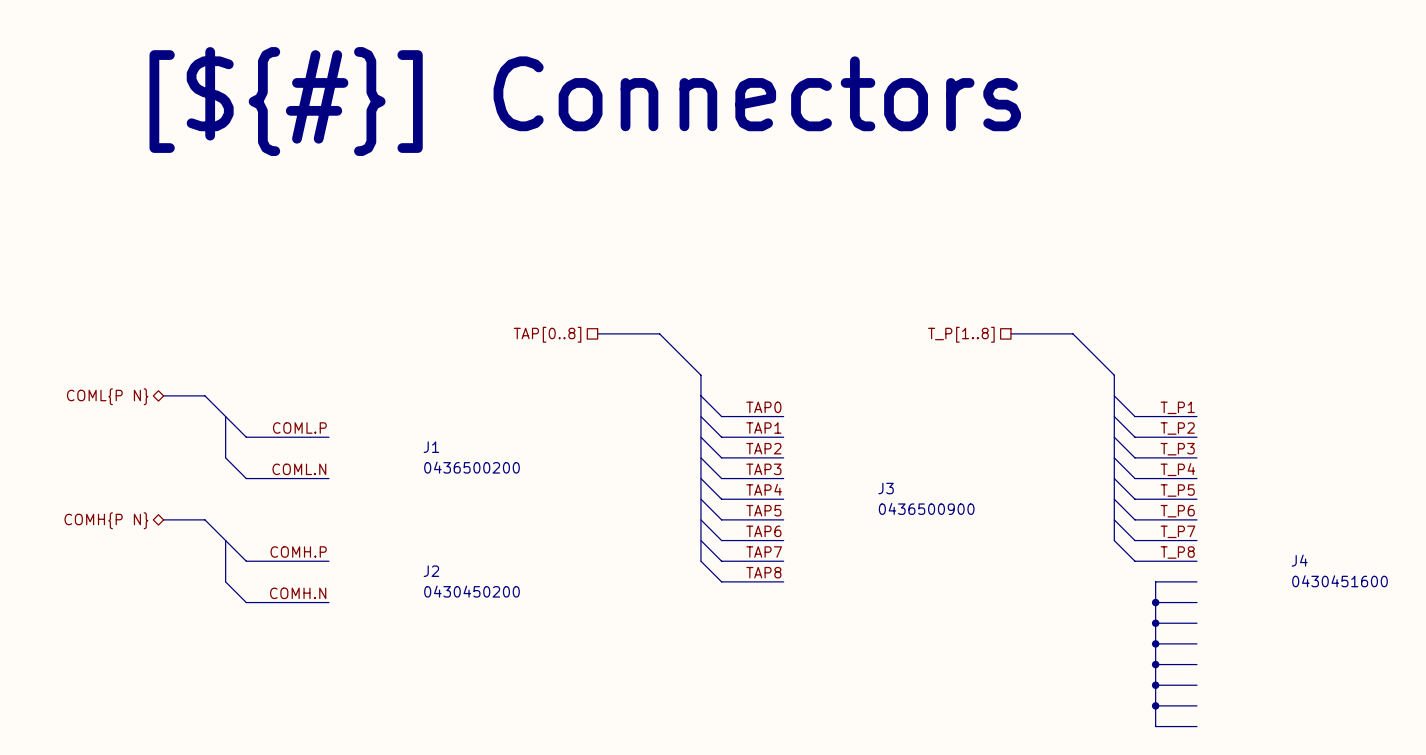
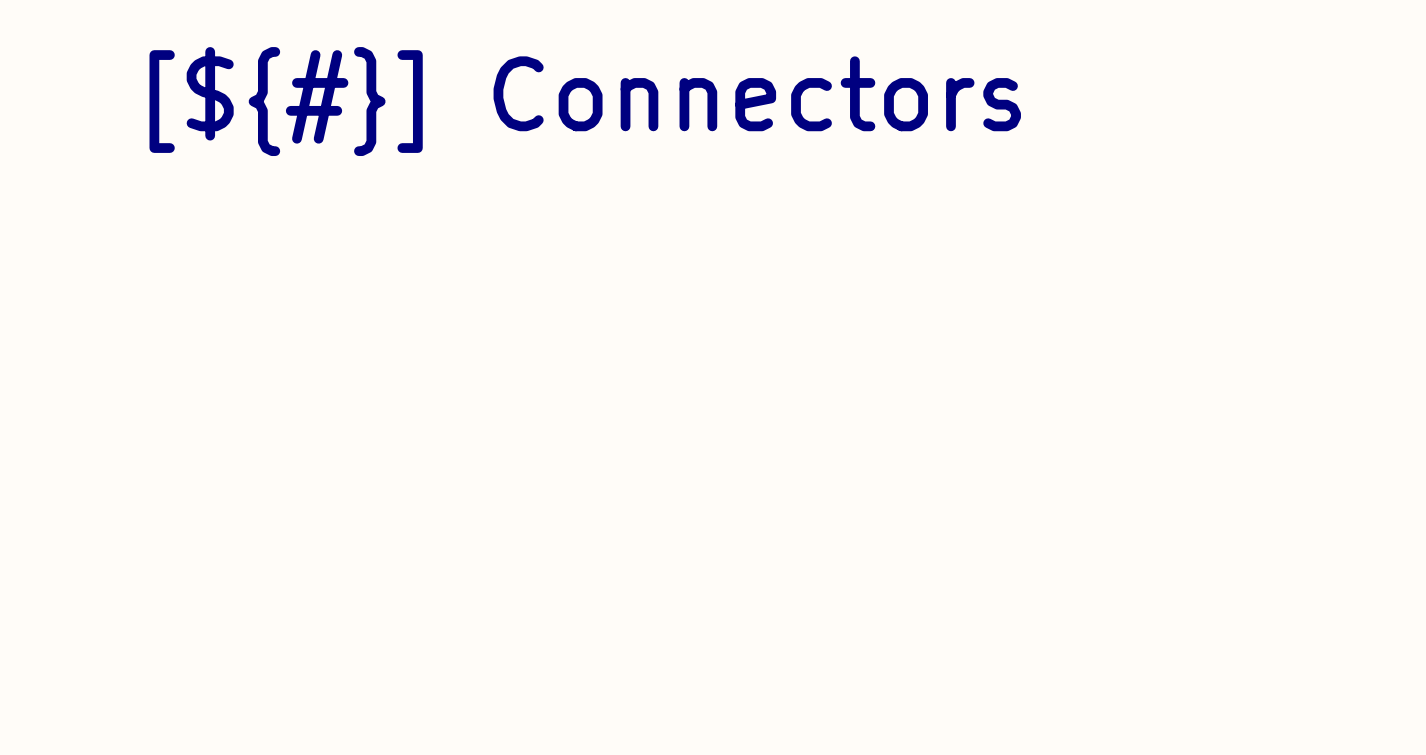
bus: (597, 333) (659, 333) (700, 375) (700, 561) -> none
bus: (1010, 333) (1072, 333) (1114, 375) (1114, 540) -> none
hierarchical label: TAP[0..8] (547, 334) -> none
hierarchical label: T_P[1..8] (961, 334) -> none
bus: (163, 395) (204, 395) (225, 416) (225, 457) -> none
wire: (700, 395) (721, 416) (783, 416) -> none
wire: (1114, 395) (1134, 416) (1196, 416) -> none
hierarchical label: COML{P N} (107, 396) -> none
label: TAP0 (763, 407) -> none
label: T_P1 (1177, 407) -> none
wire: (225, 416) (246, 437) (328, 437) -> none
wire: (700, 416) (721, 437) (783, 437) -> none
wire: (1114, 416) (1134, 437) (1196, 437) -> none
label: COML.P (299, 428) -> none
label: TAP1 (763, 428) -> none
label: T_P2 (1177, 428) -> none
wire: (700, 437) (721, 457) (783, 457) -> none
wire: (1114, 437) (1134, 457) (1196, 457) -> none
label: TAP2 (763, 448) -> none
label: T_P3 (1177, 449) -> none
wire: (225, 457) (246, 478) (328, 478) -> none
J1: 0436500200 (471, 457) -> none
wire: (700, 457) (721, 478) (783, 478) -> none
wire: (1114, 457) (1134, 478) (1196, 478) -> none
label: COML.N (299, 469) -> none
label: TAP3 (763, 469) -> none
label: T_P4 (1177, 469) -> none
wire: (700, 478) (721, 499) (783, 499) -> none
wire: (1114, 478) (1134, 499) (1196, 499) -> none
label: TAP4 (764, 489) -> none
label: T_P5 (1177, 490) -> none
J3: 0436500900 (926, 498) -> none
wire: (700, 499) (721, 519) (783, 519) -> none
wire: (1114, 499) (1134, 519) (1196, 519) -> none
label: TAP5 (763, 510) -> none
label: T_P6 (1177, 511) -> none
bus: (163, 519) (204, 519) (225, 540) (225, 581) -> none
wire: (700, 519) (721, 540) (783, 540) -> none
wire: (1114, 519) (1134, 540) (1196, 540) -> none
hierarchical label: COMH{P N} (106, 520) -> none
label: TAP6 (763, 531) -> none
label: T_P7 (1177, 531) -> none
wire: (225, 540) (246, 561) (328, 561) -> none
wire: (700, 540) (721, 561) (783, 561) -> none
wire: (1114, 540) (1134, 561) (1196, 561) -> none
label: COMH.P (298, 552) -> none
label: TAP7 (764, 552) -> none
label: T_P8 (1177, 552) -> none
wire: (700, 561) (721, 581) (783, 581) -> none
J4: 0430451600 (1339, 570) -> none
label: TAP8 (763, 572) -> none
wire: (225, 581) (246, 602) (328, 602) -> none
J2: 0430450200 (471, 581) -> none
wire: (1196, 581) (1155, 581) (1155, 726) (1196, 726) -> none
label: COMH.N (298, 593) -> none
wire: (1155, 602) (1196, 602) -> none
junction: (1155, 602) -> none
wire: (1155, 623) (1196, 623) -> none
junction: (1155, 623) -> none
wire: (1155, 643) (1196, 643) -> none
junction: (1155, 643) -> none
wire: (1155, 664) (1196, 664) -> none
junction: (1155, 664) -> none
wire: (1155, 685) (1196, 685) -> none
junction: (1155, 685) -> none
wire: (1155, 705) (1196, 705) -> none
junction: (1155, 705) -> none

